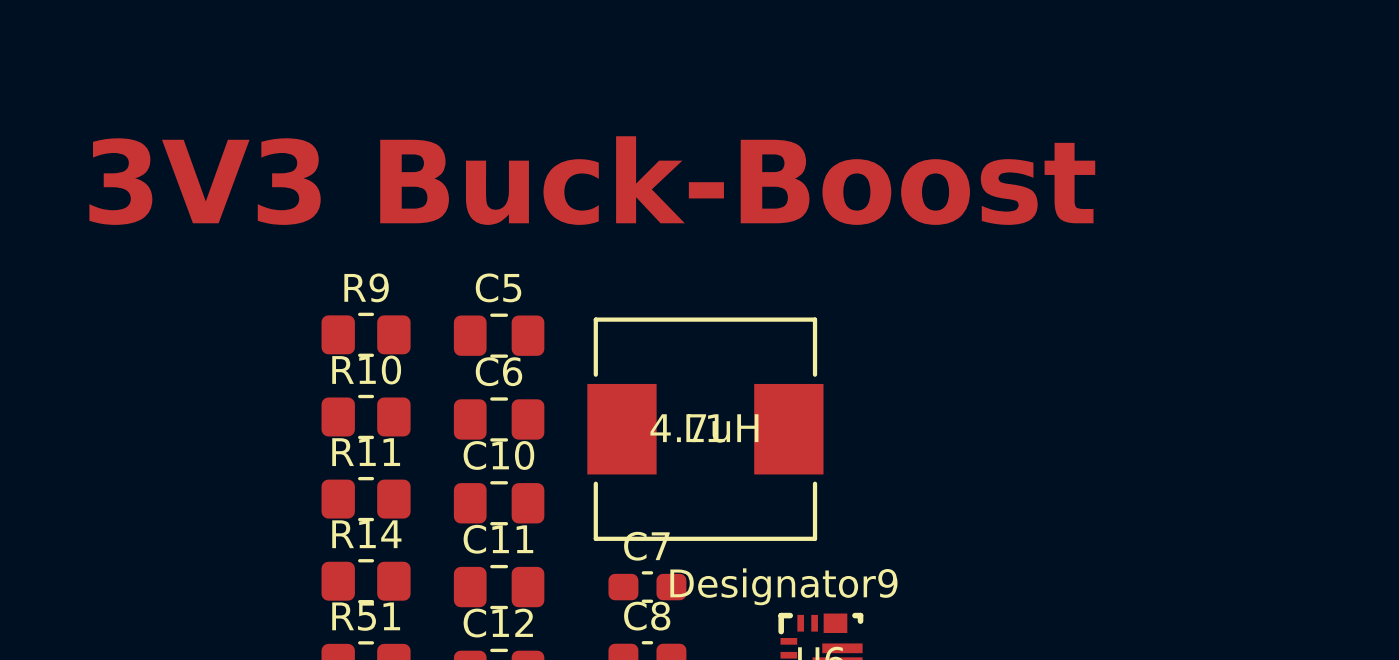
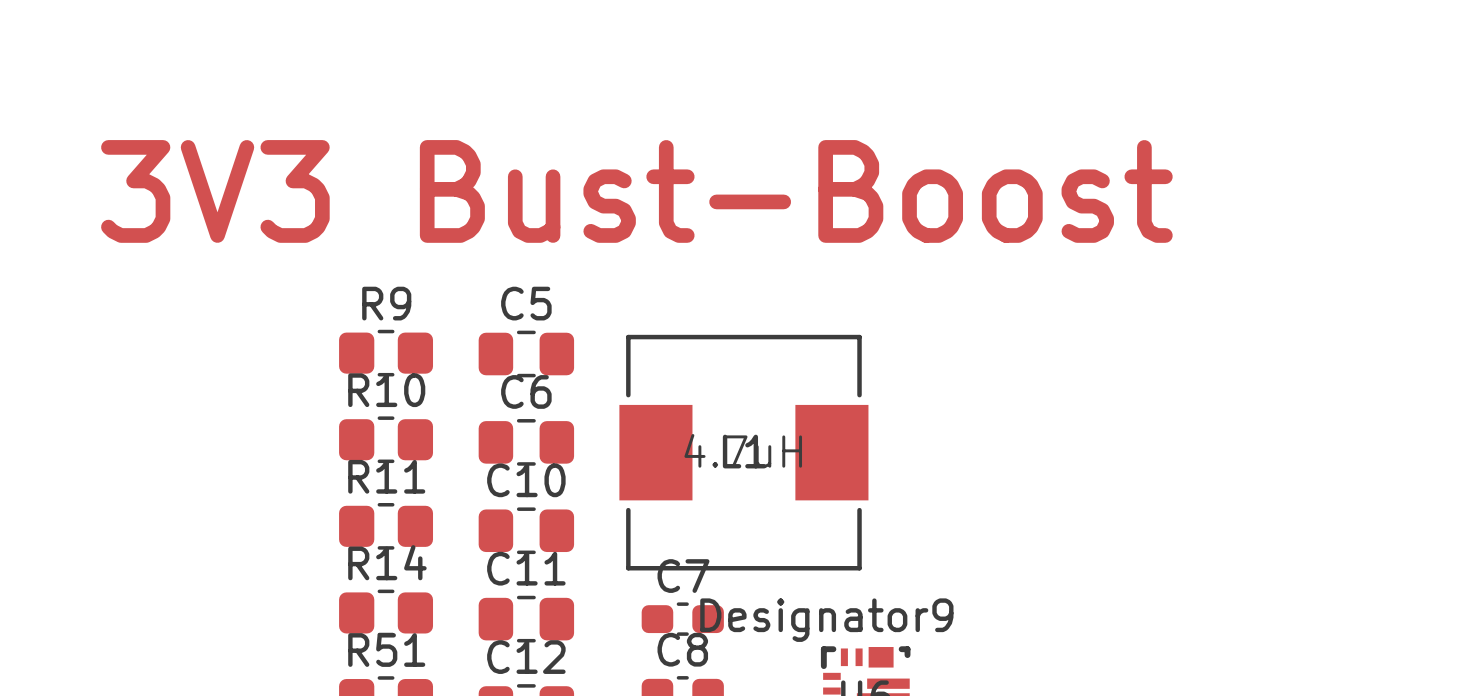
text: 3V3 Buck-Boost (592, 180) -> 3V3 Bust-Boost (636, 191)

